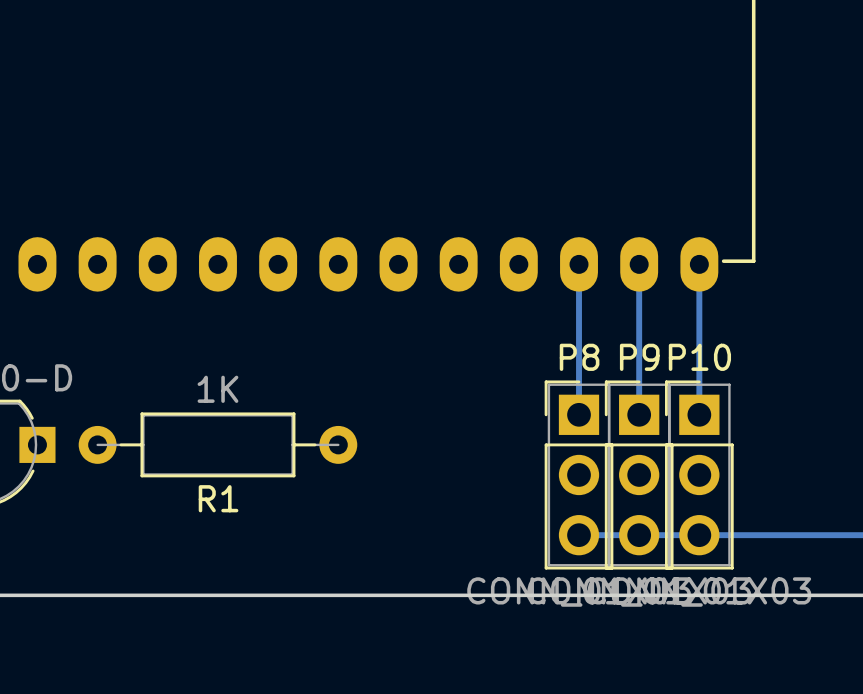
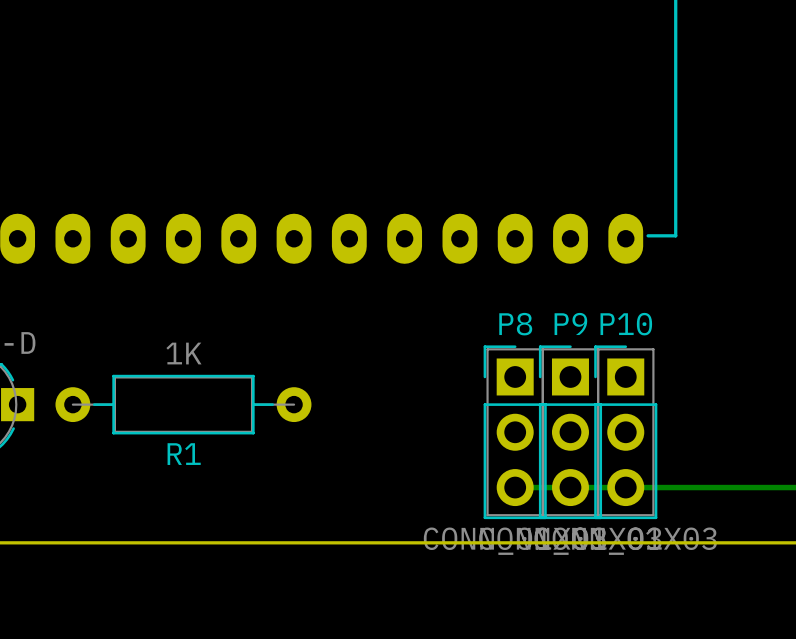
bottom track: (579, 264) (579, 414) -> none
bottom track: (639, 264) (639, 414) -> none
bottom track: (699, 264) (699, 414) -> none

